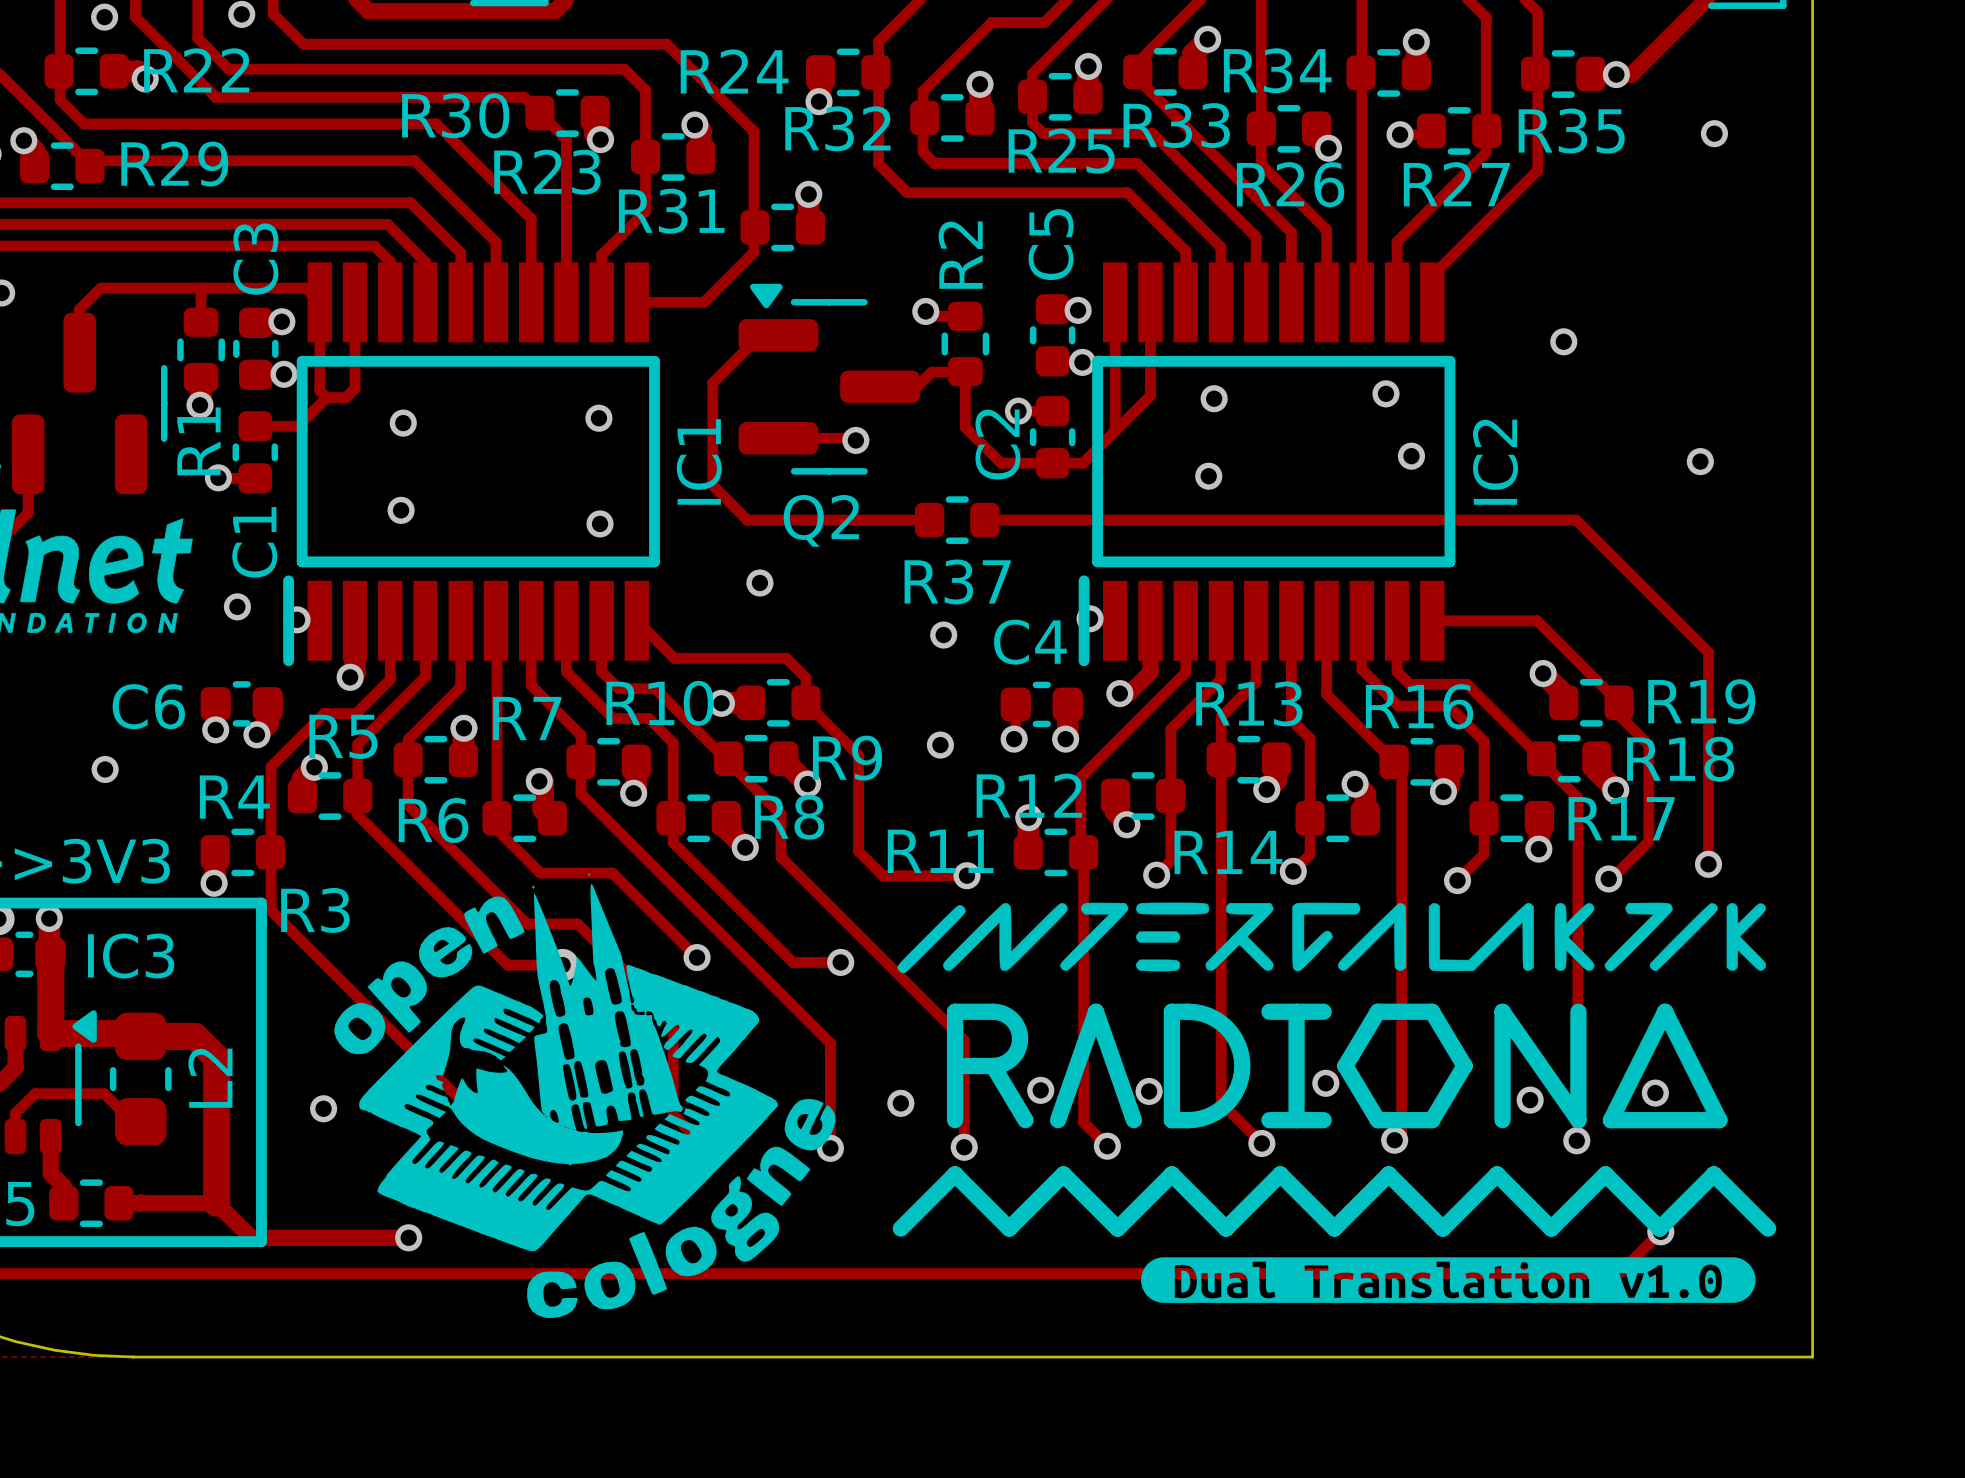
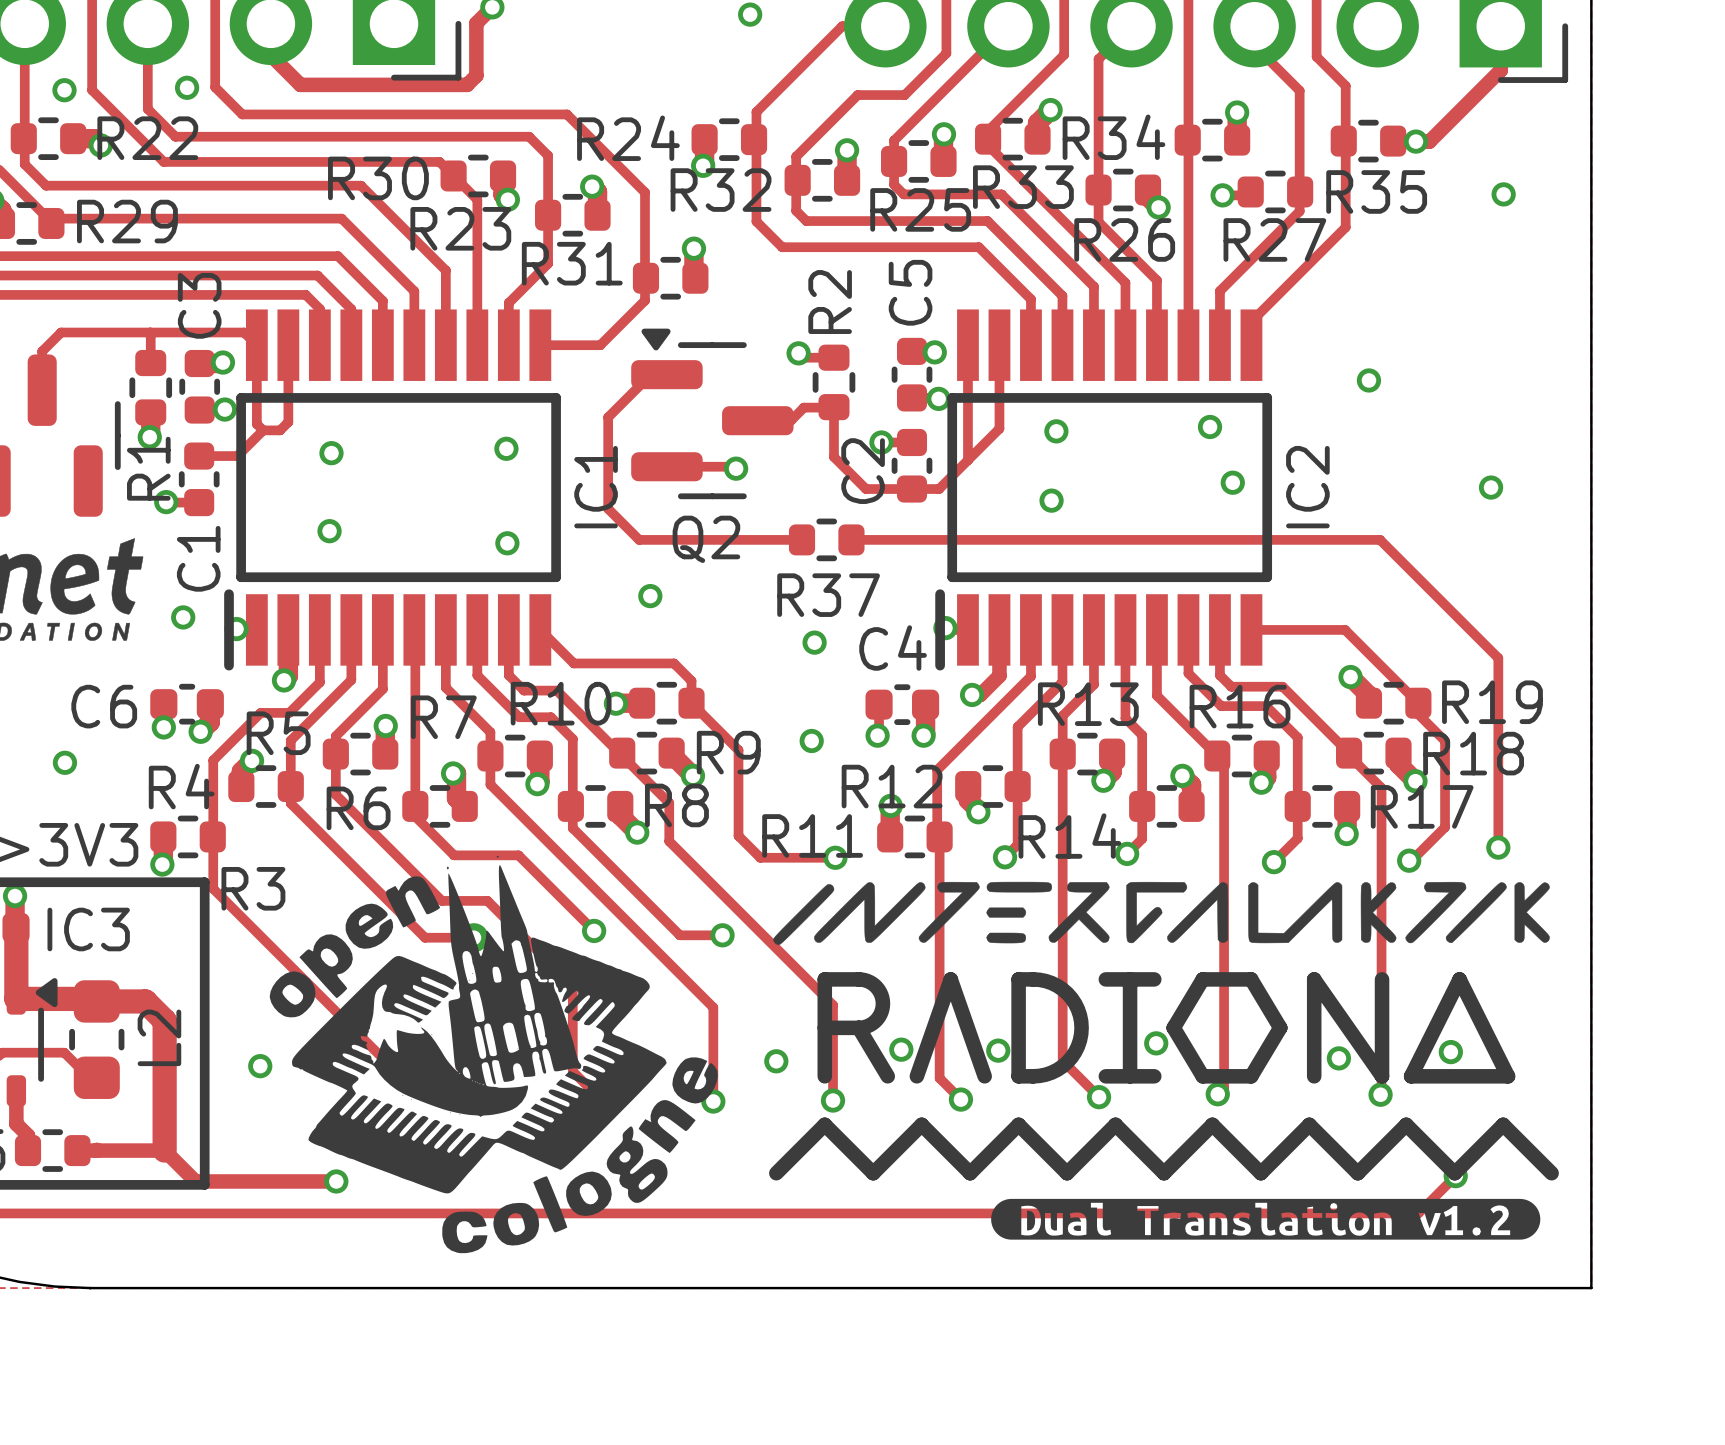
drawing shape: [1141, 1257, 1756, 1303] -> [991, 1198, 1541, 1240]

